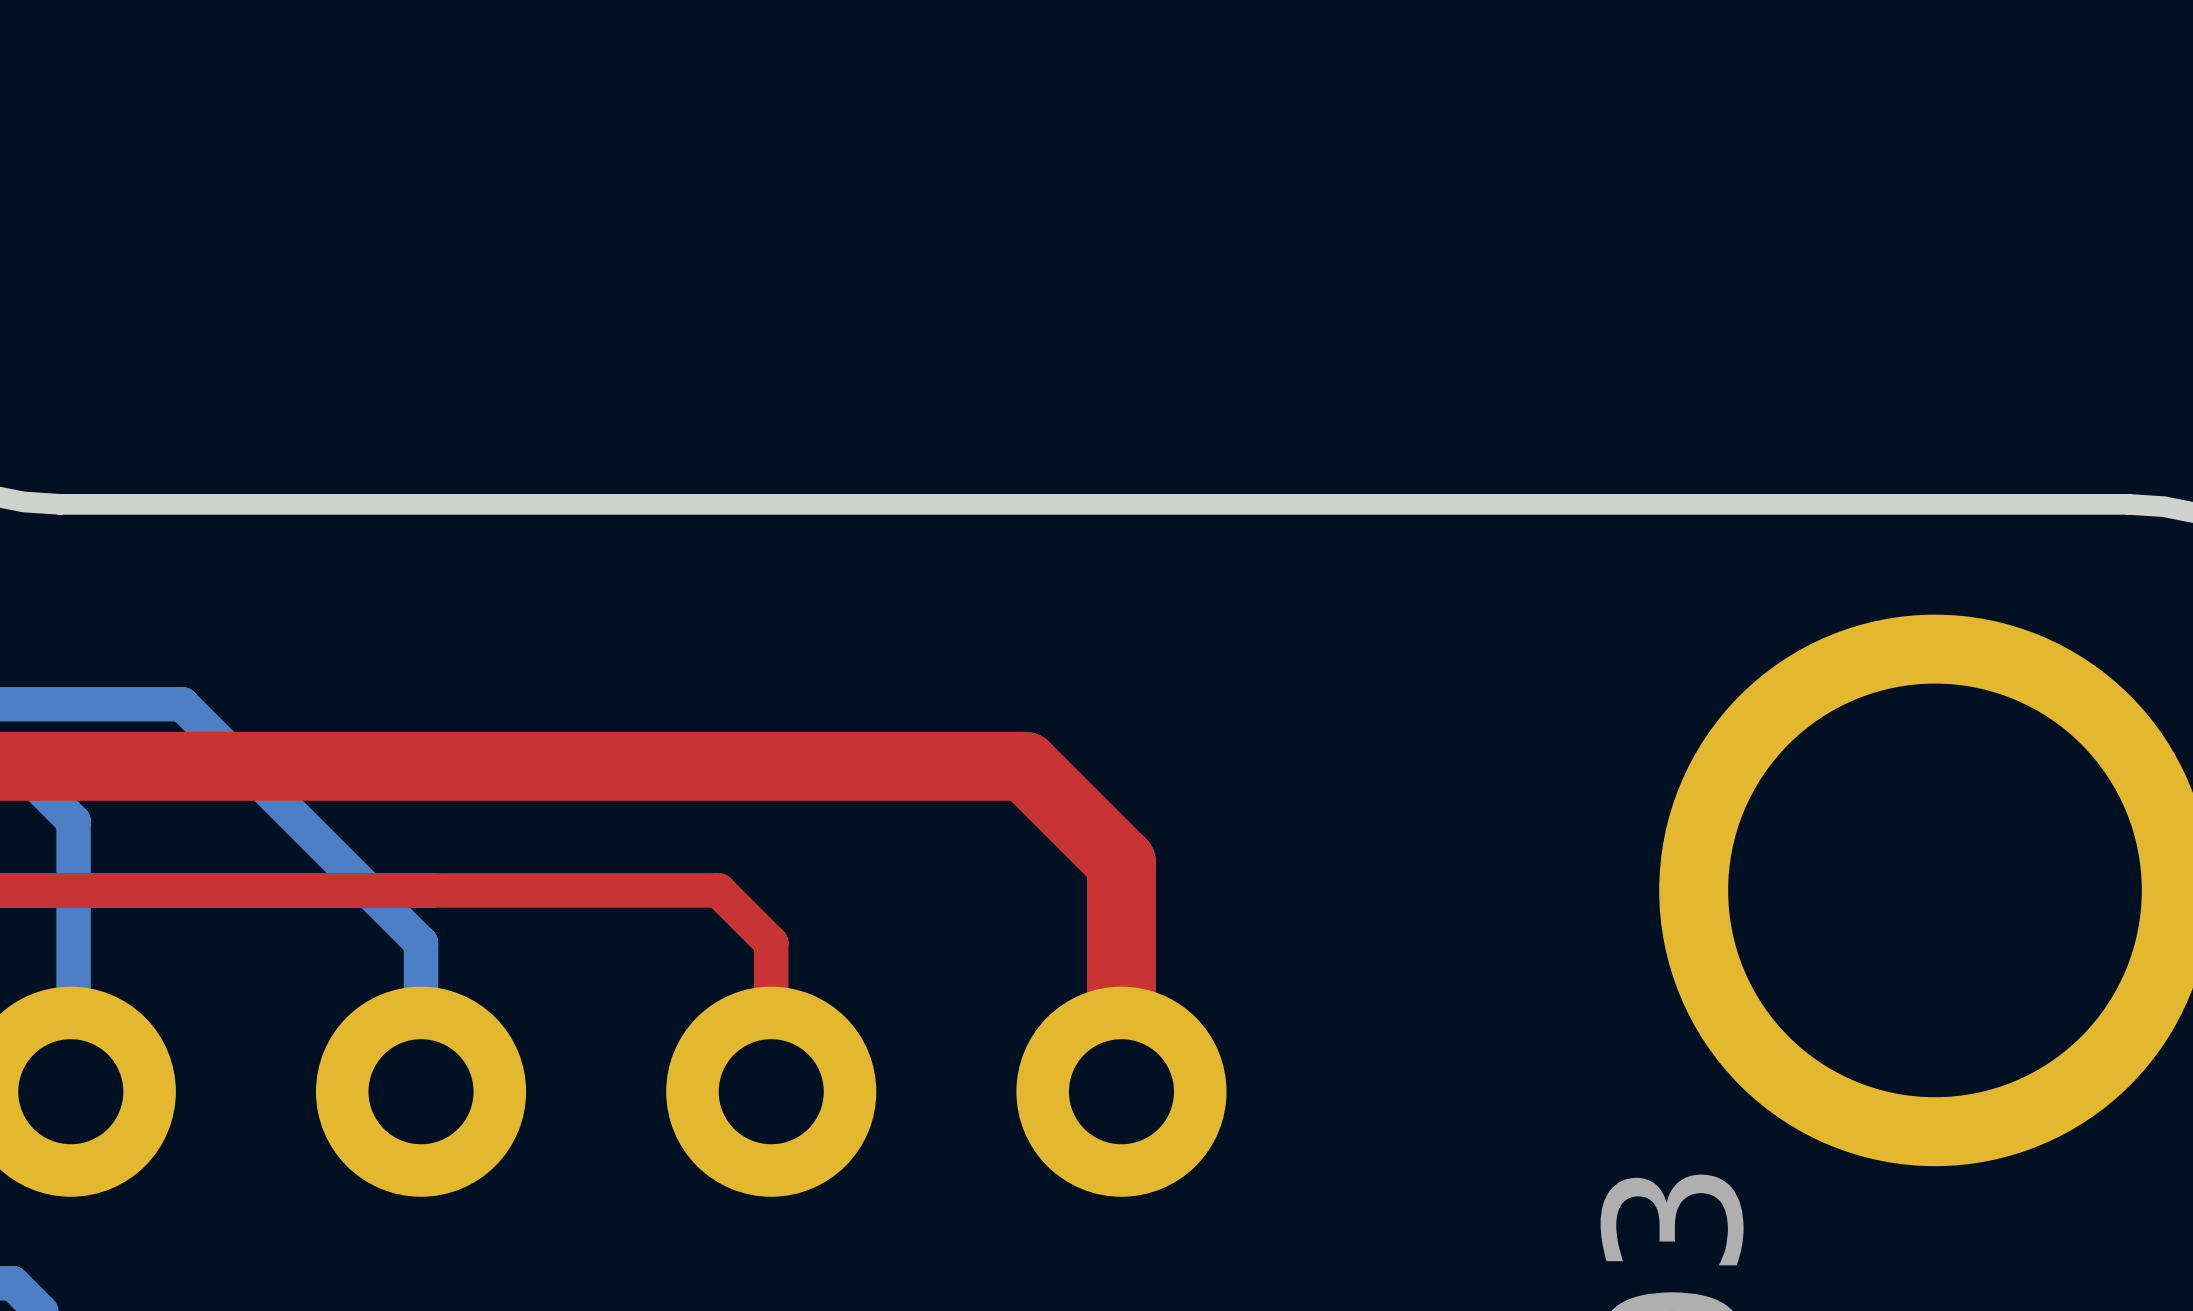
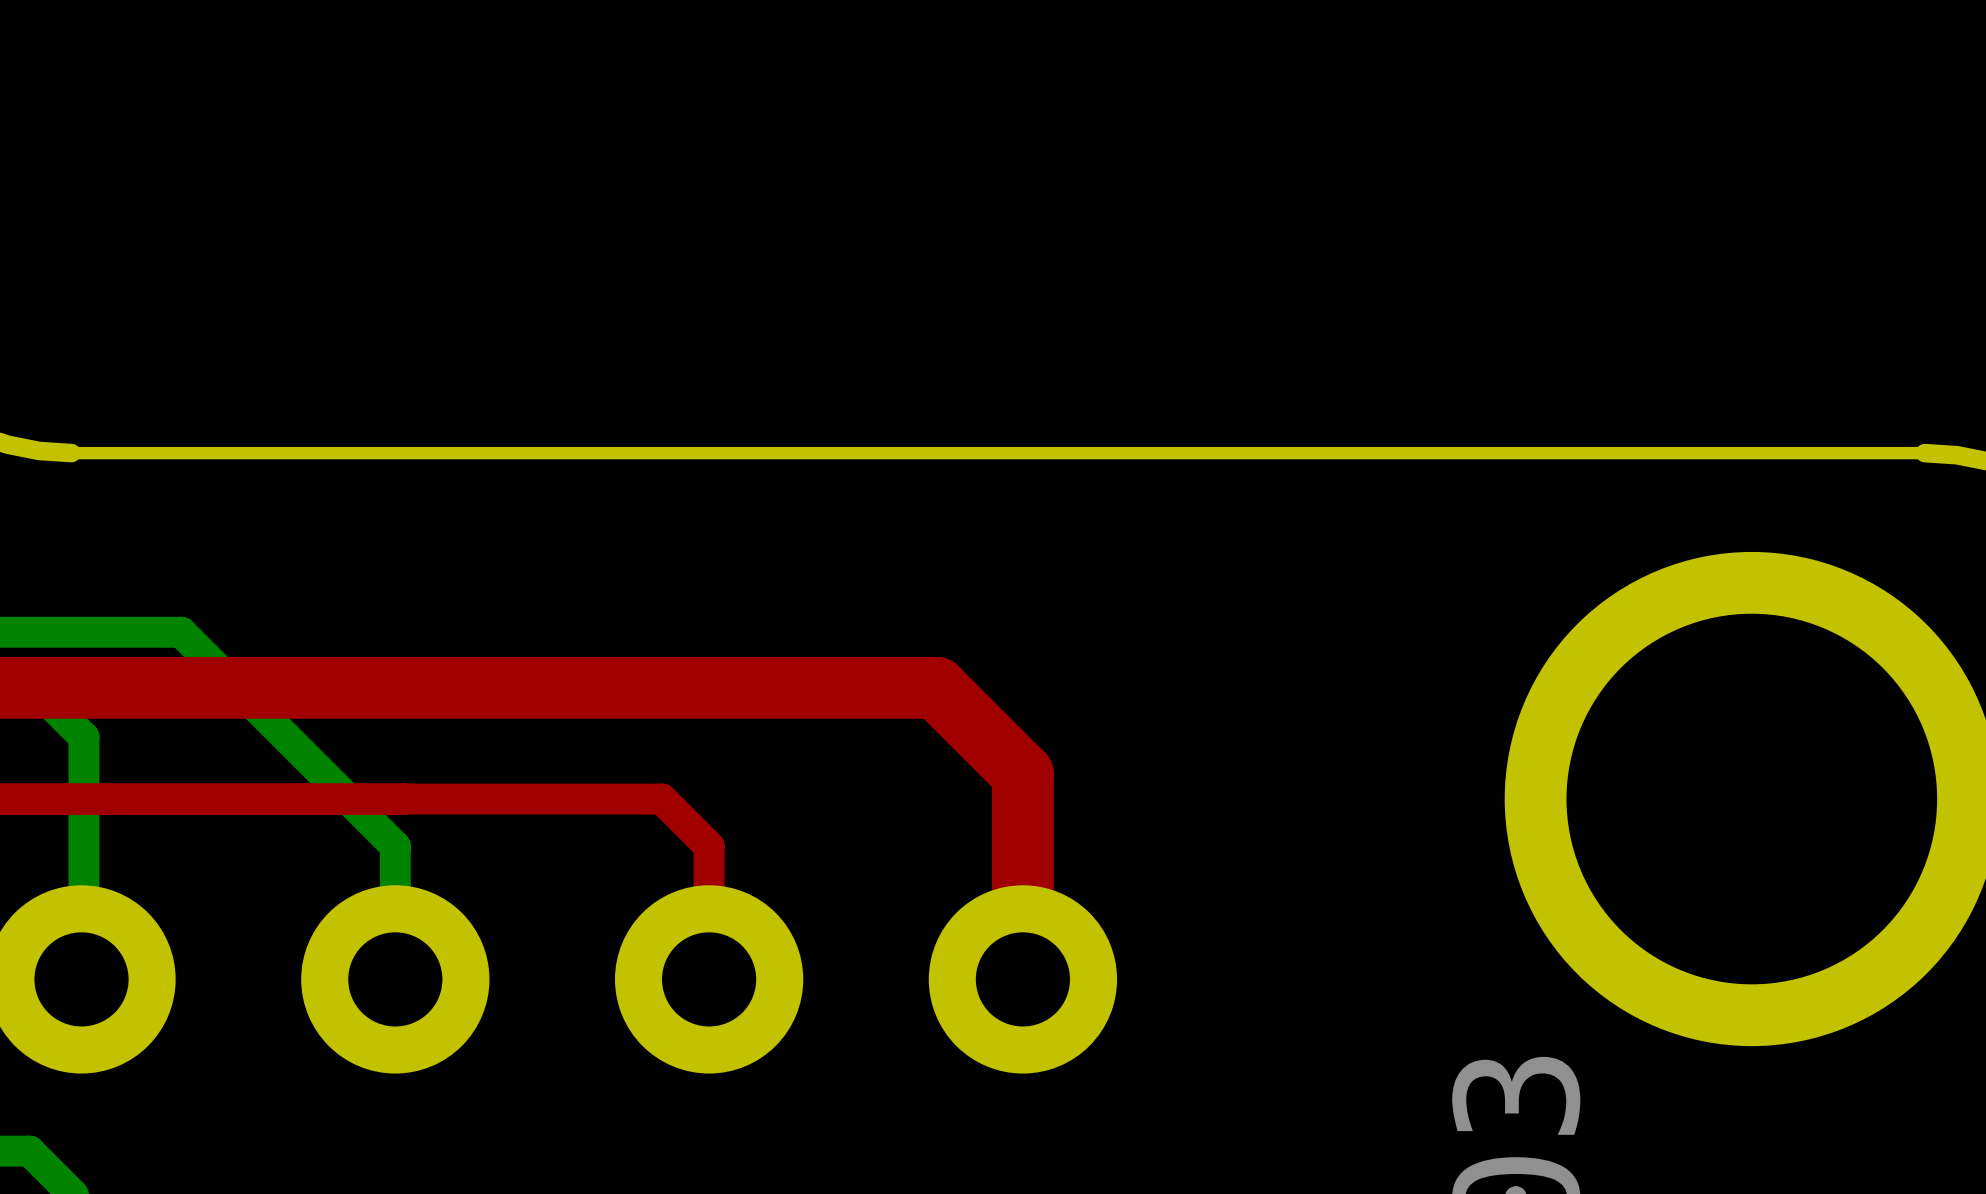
board edge width: thick (59, 504) (2128, 504) -> thin (71, 453) (1924, 453)

